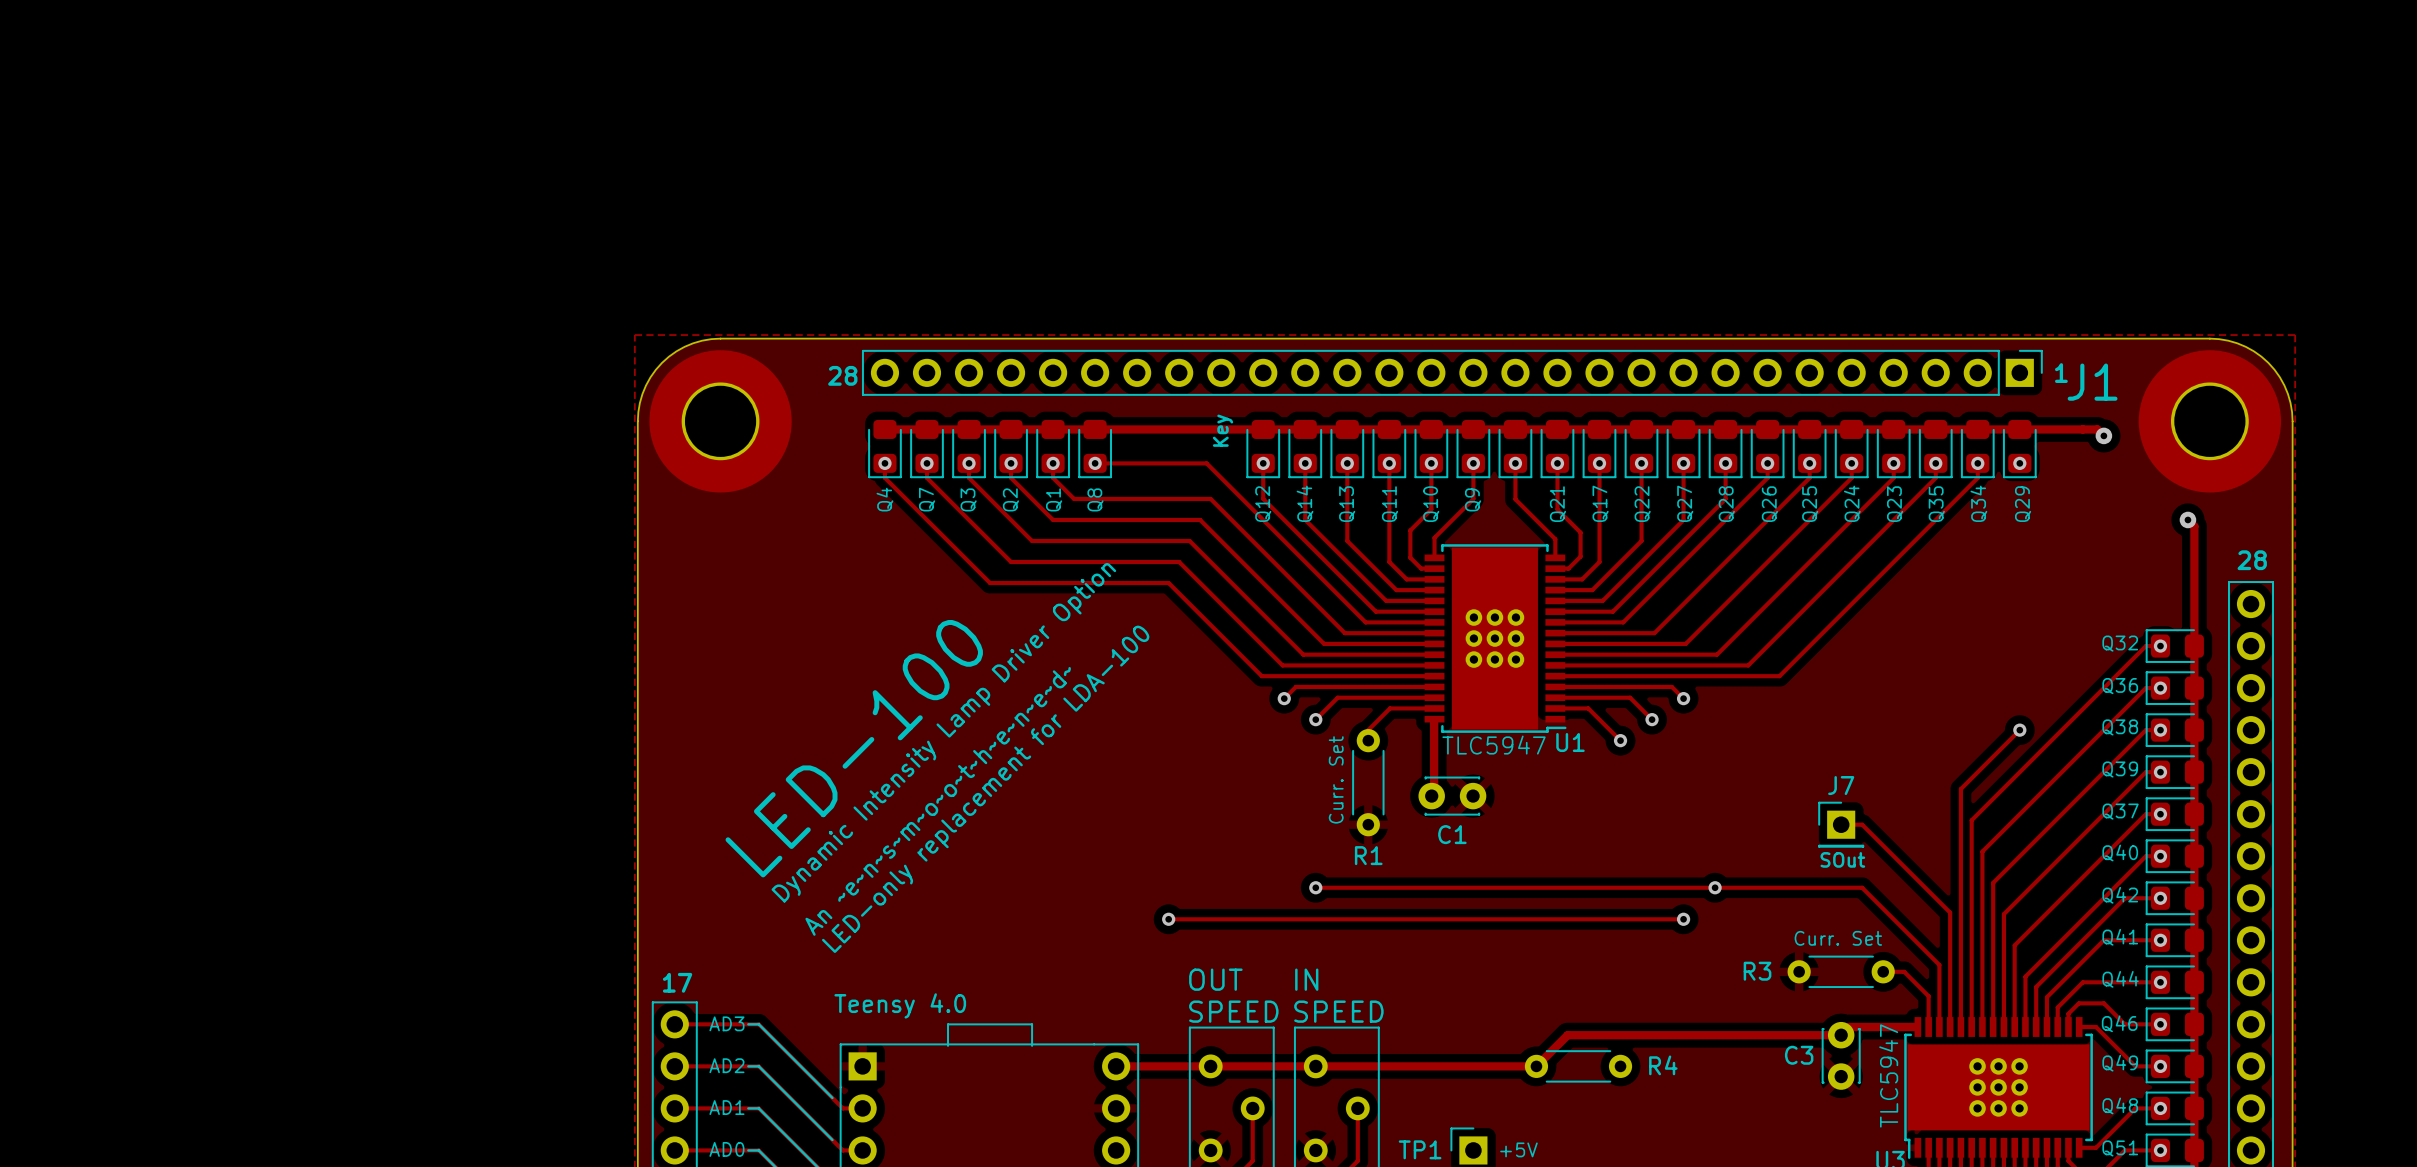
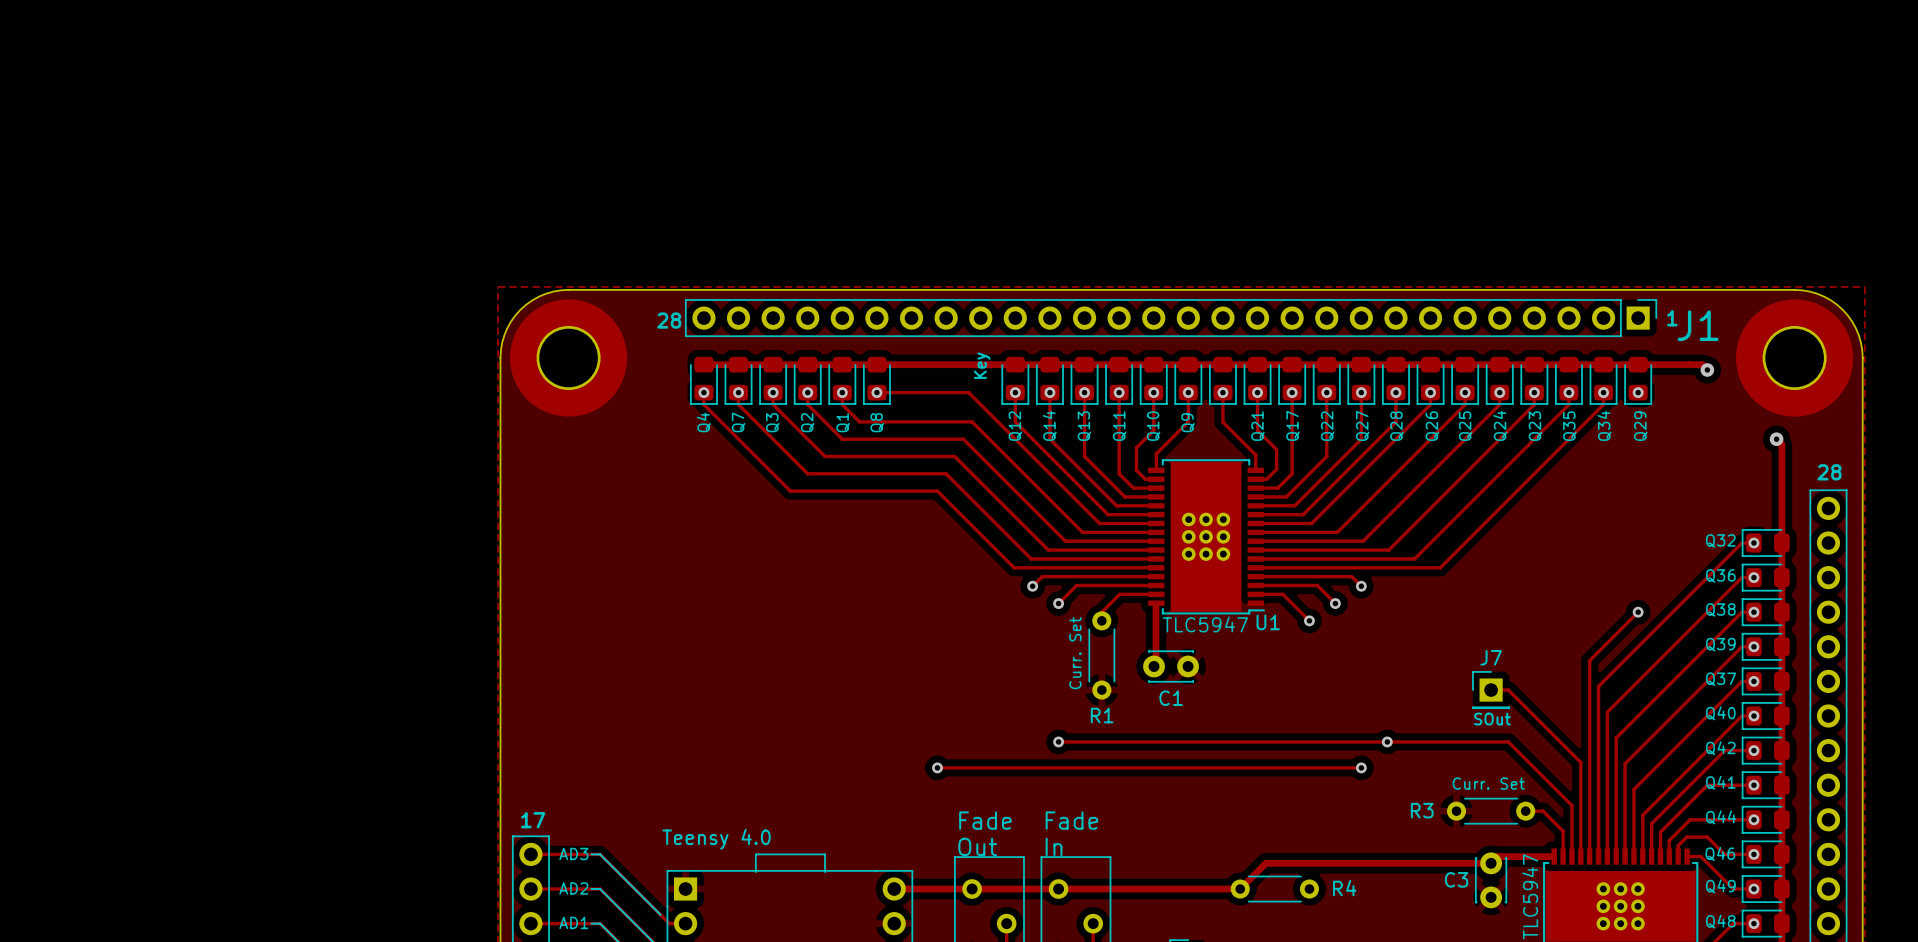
text: Dynamic Intensity Lamp Driver Option (943, 732) -> none
text: LED-100 (854, 748) -> none
text: LED-only replacement for LDA-100 (985, 789) -> none
text: An ~e~n~s~m~o~o~t~h~e~n~e~d~ (938, 801) -> none
text: OUT (1215, 979) -> Fade (985, 820)
text: IN (1306, 979) -> Fade (1071, 820)
text: SPEED (1233, 1011) -> Out (977, 846)
text: SPEED (1338, 1011) -> In (1054, 846)

